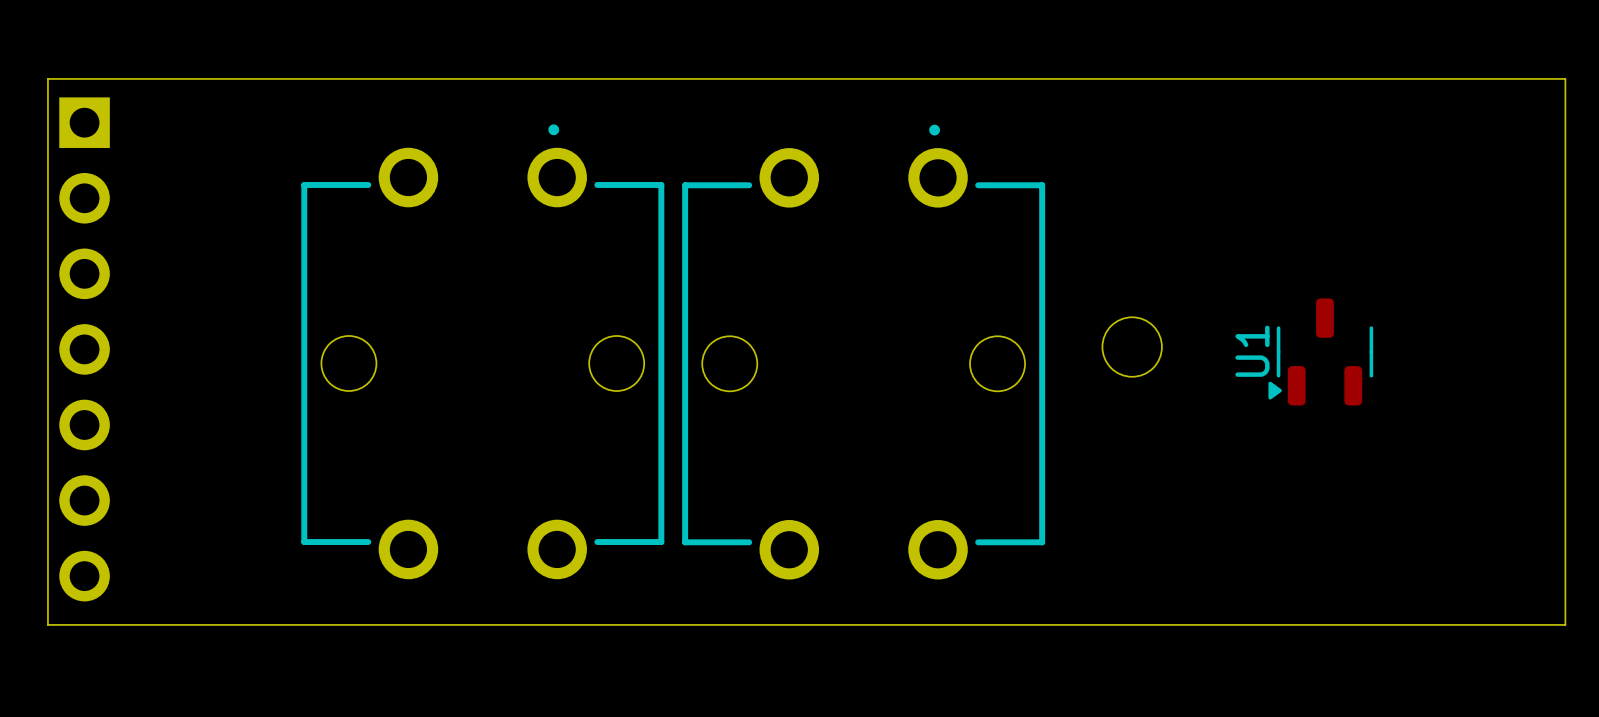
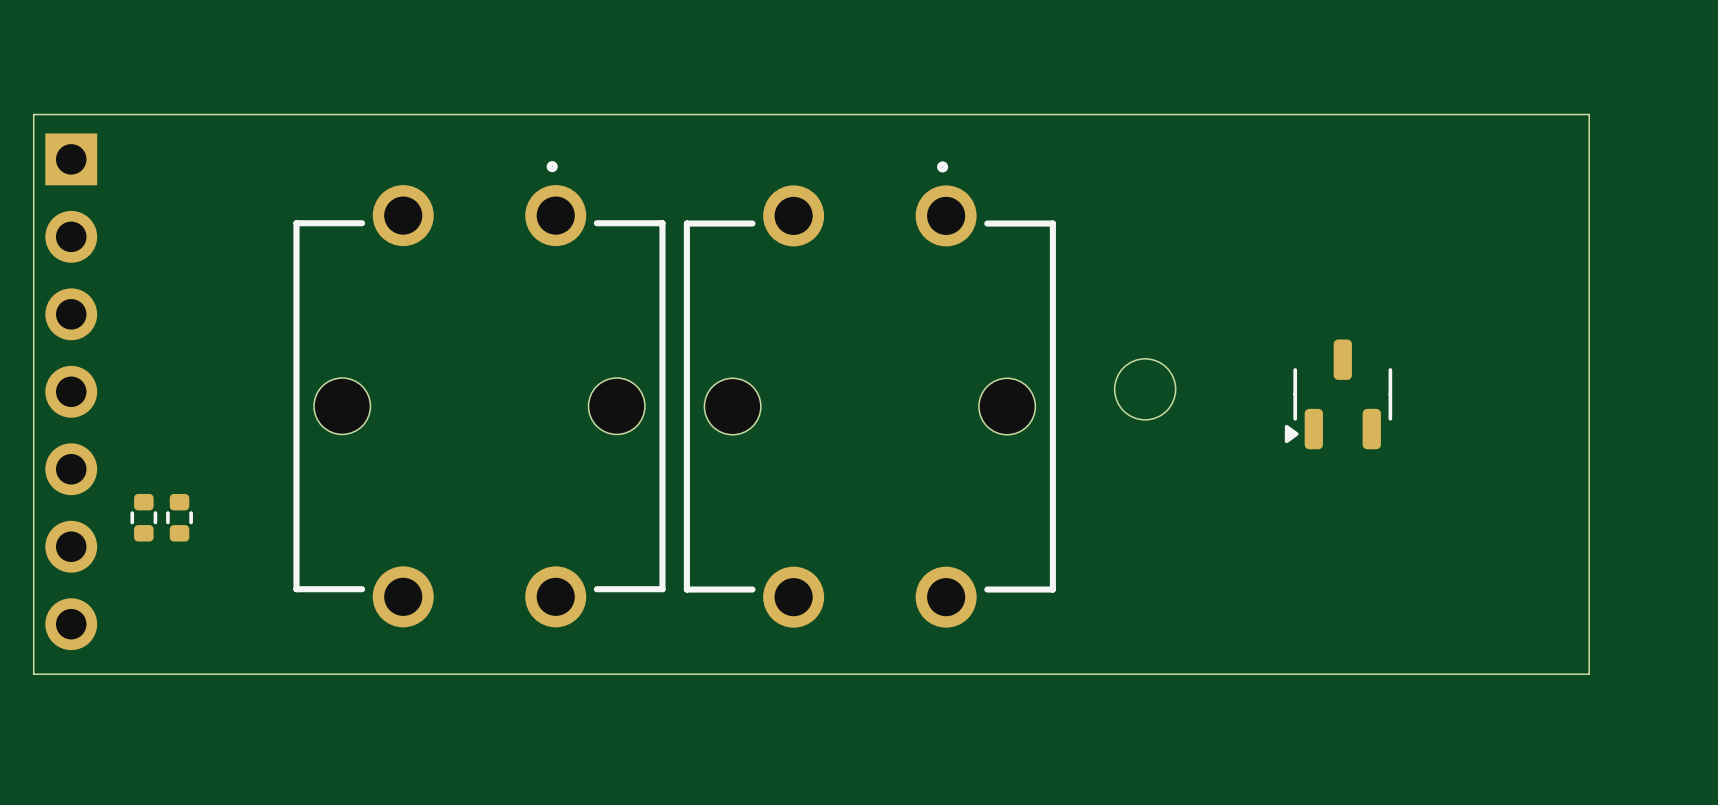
U1 name: U1 (1252, 351) -> none
part: none -> (143, 517)
part: none -> (179, 517)

